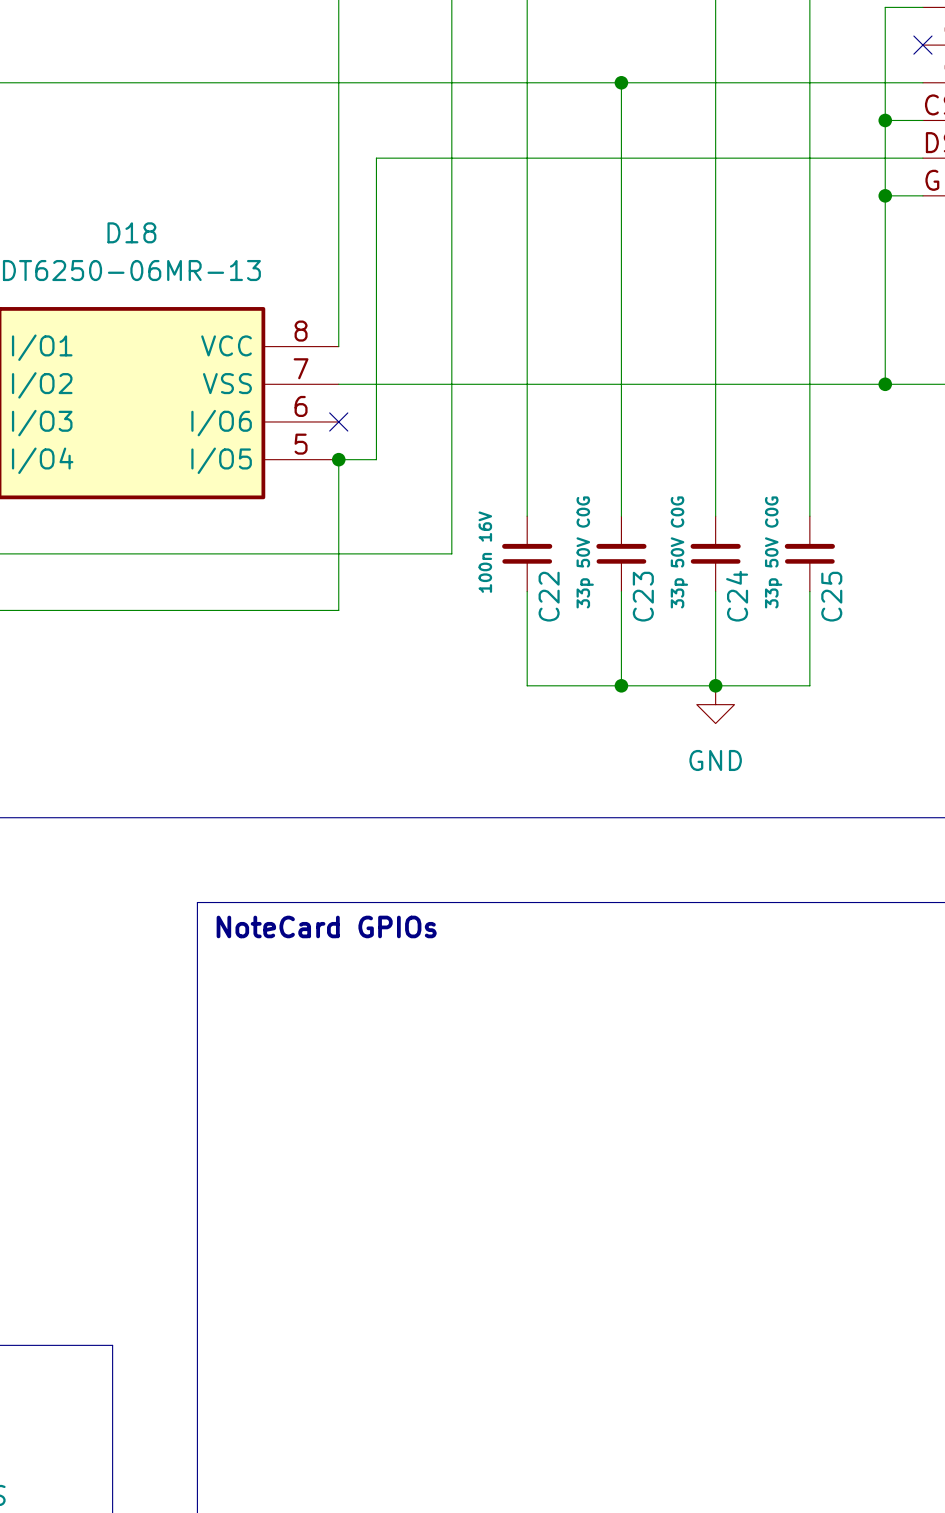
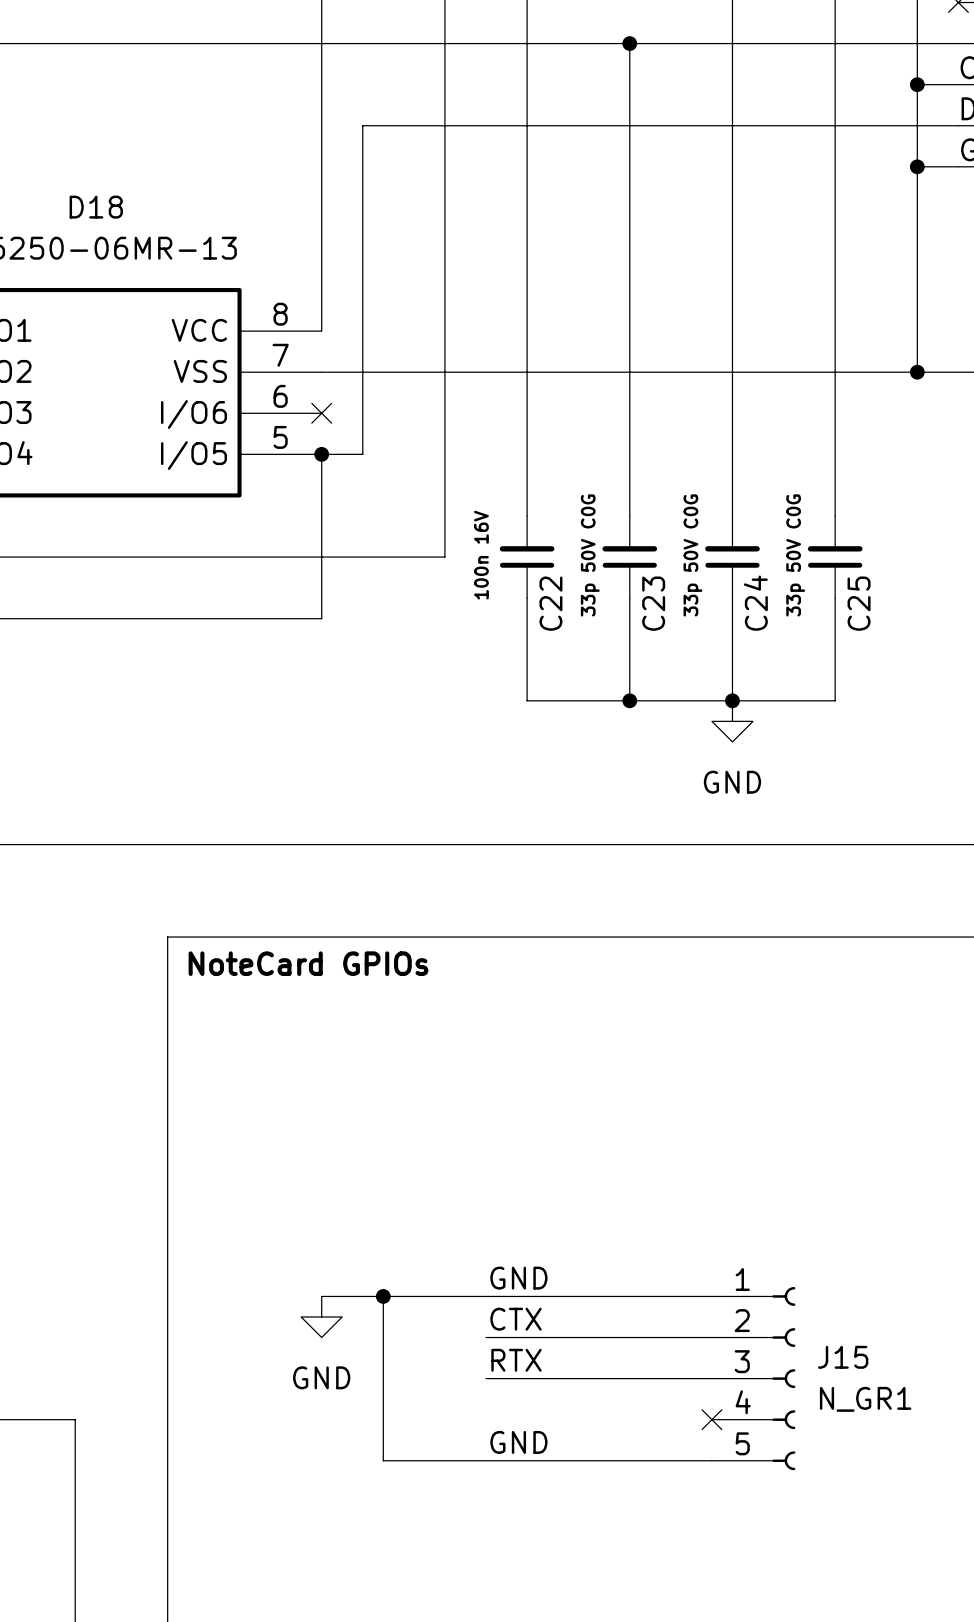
label: none -> GND (518, 1278)
wire: none -> (321, 1296) (711, 1296)
wire: none -> (383, 1296) (383, 1460) (711, 1460)
junction: none -> (383, 1296)
power symbol: none -> GND (321, 1316)
label: none -> CTX (515, 1319)
wire: none -> (486, 1337) (711, 1337)
label: none -> RTX (516, 1360)
wire: none -> (486, 1378) (711, 1378)
J15: none -> N_GR1 (753, 1378)
no-connect mark: none -> (711, 1419)
label: none -> GND (518, 1442)

